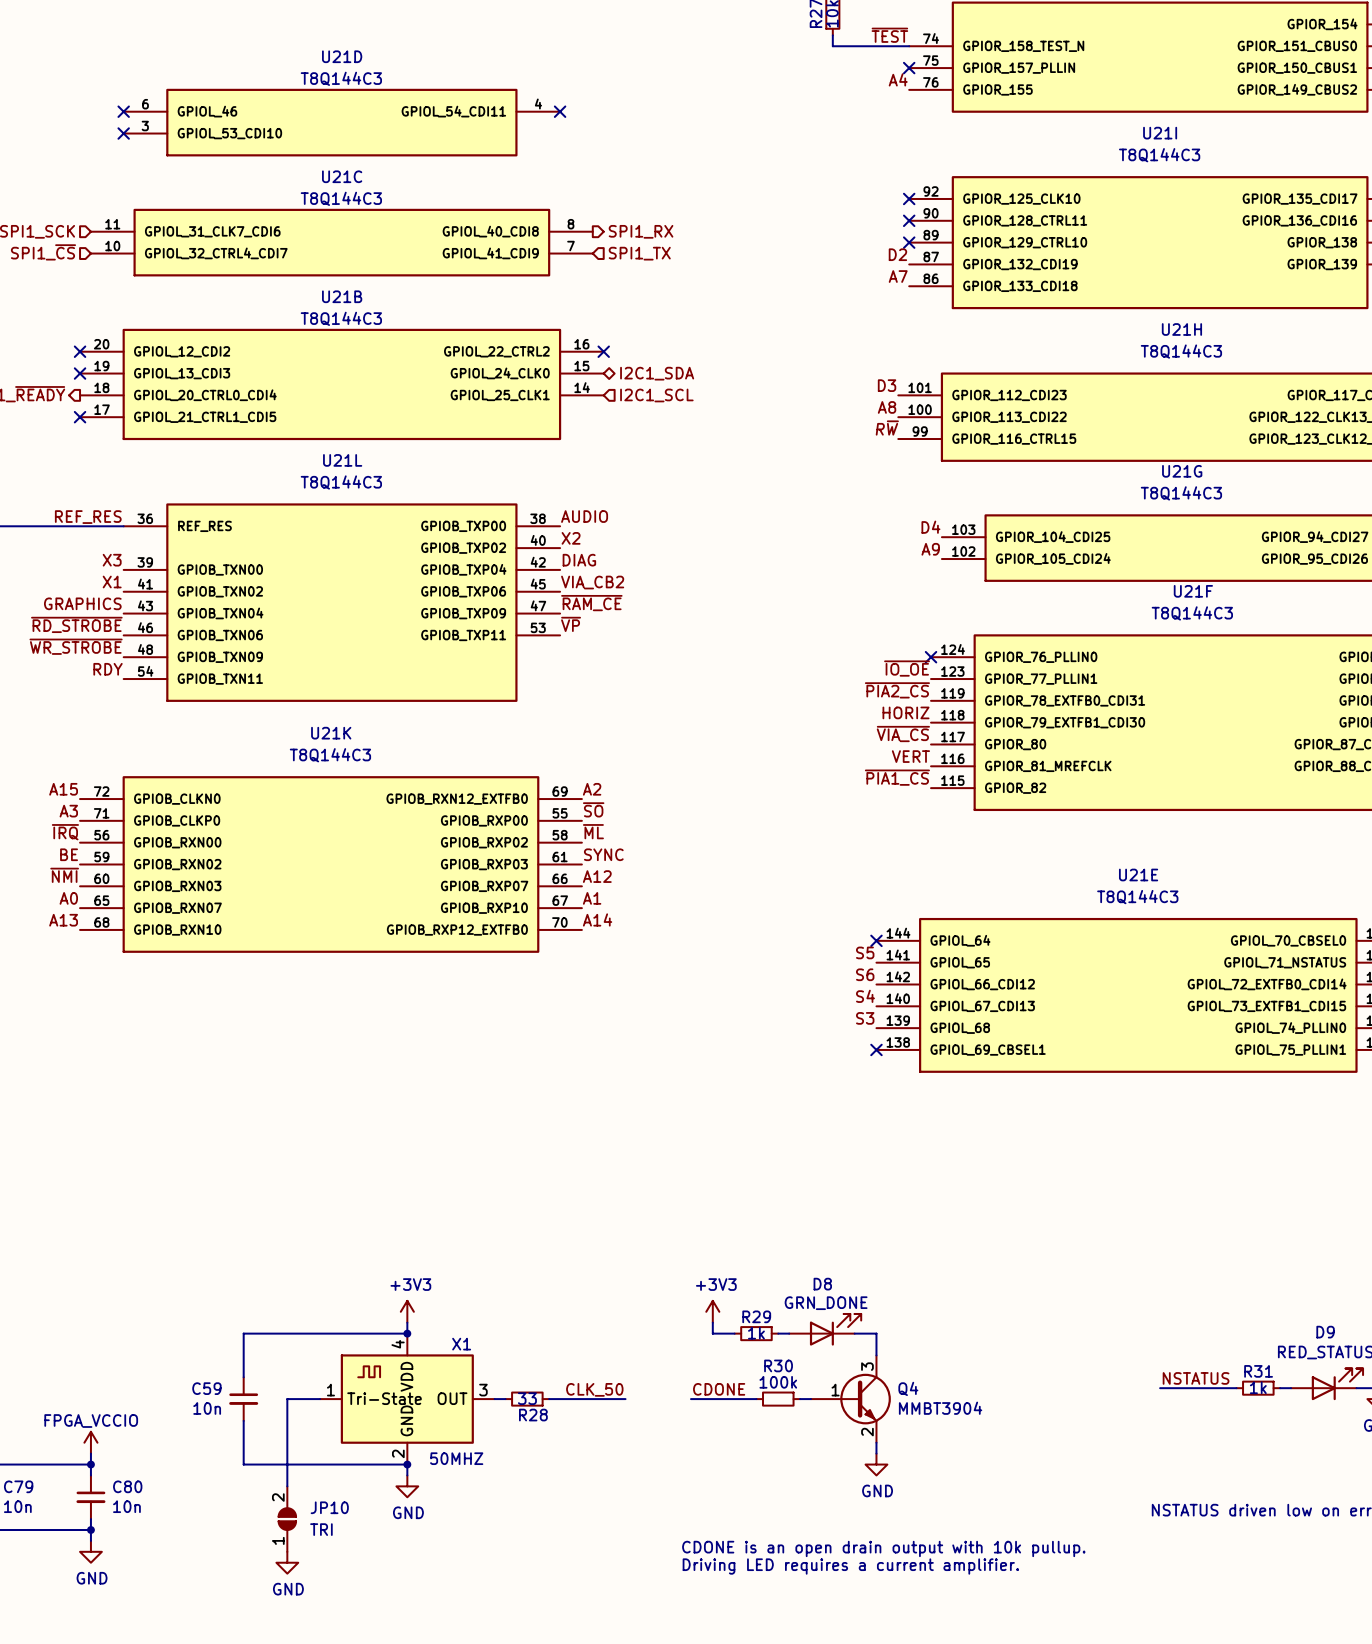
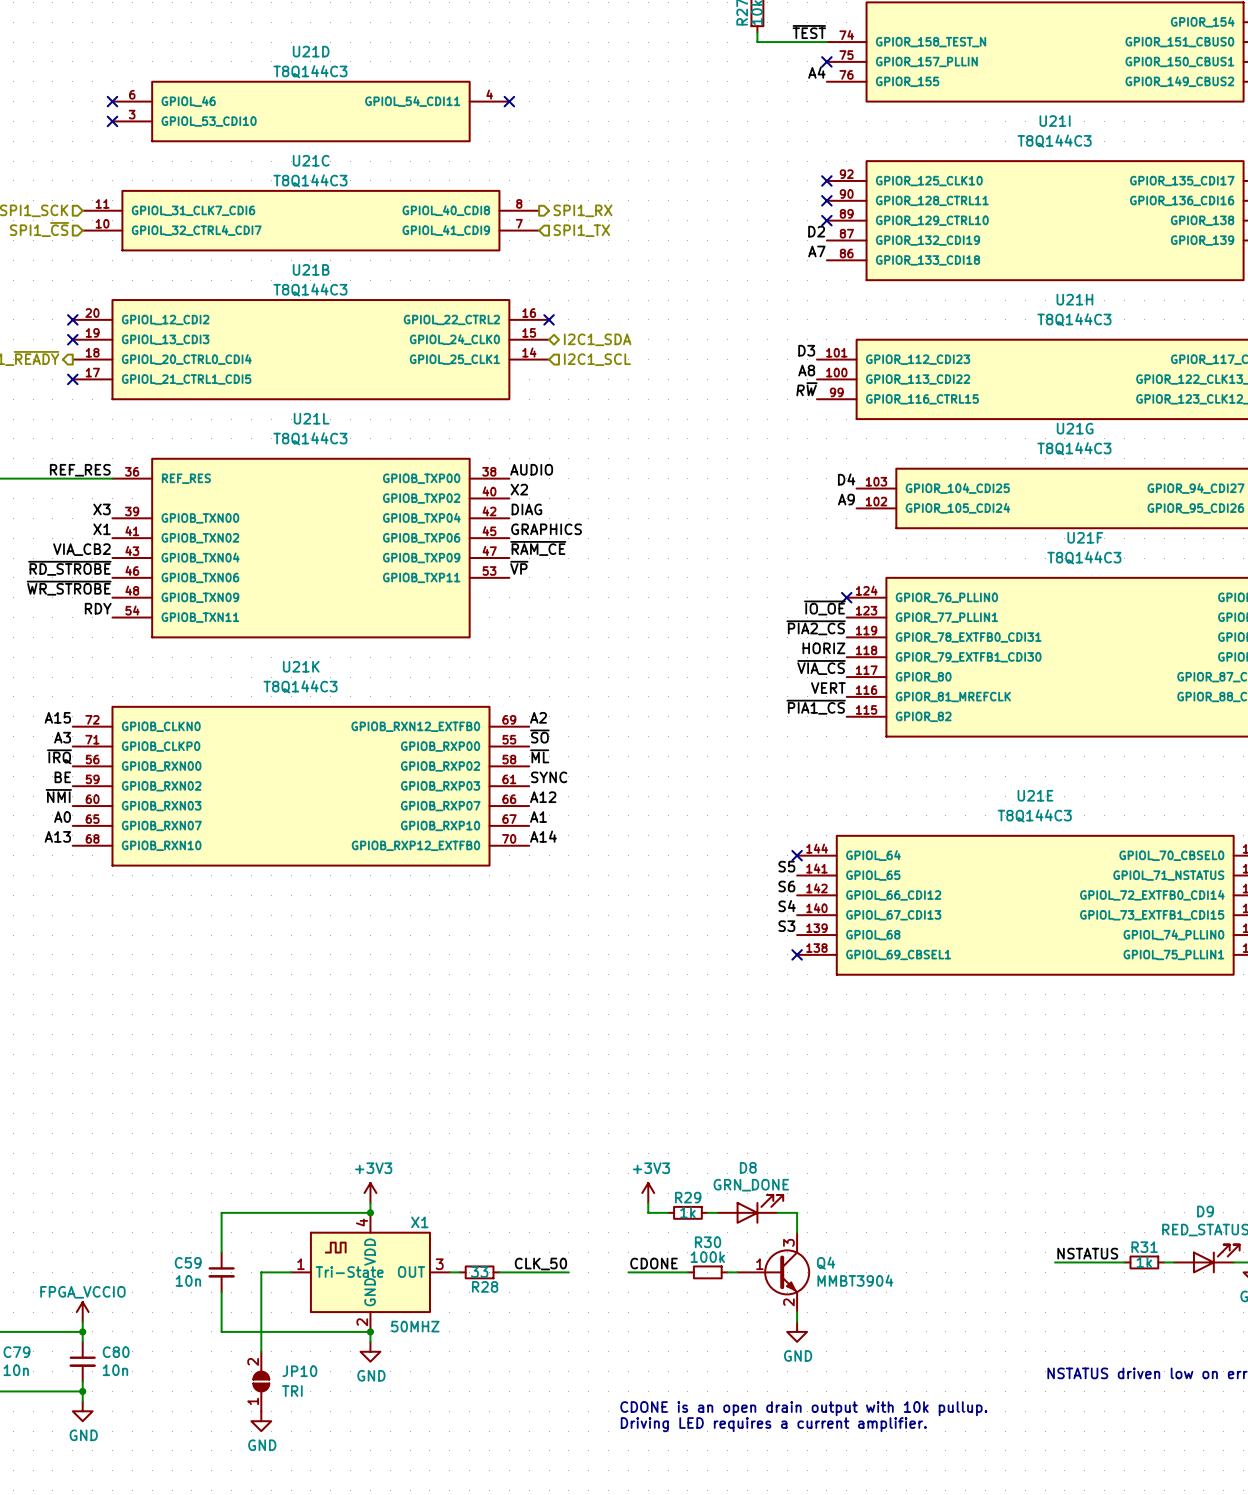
label: VIA_CB2 (592, 582) -> GRAPHICS (546, 529)
label: GRAPHICS (82, 603) -> VIA_CB2 (81, 549)

